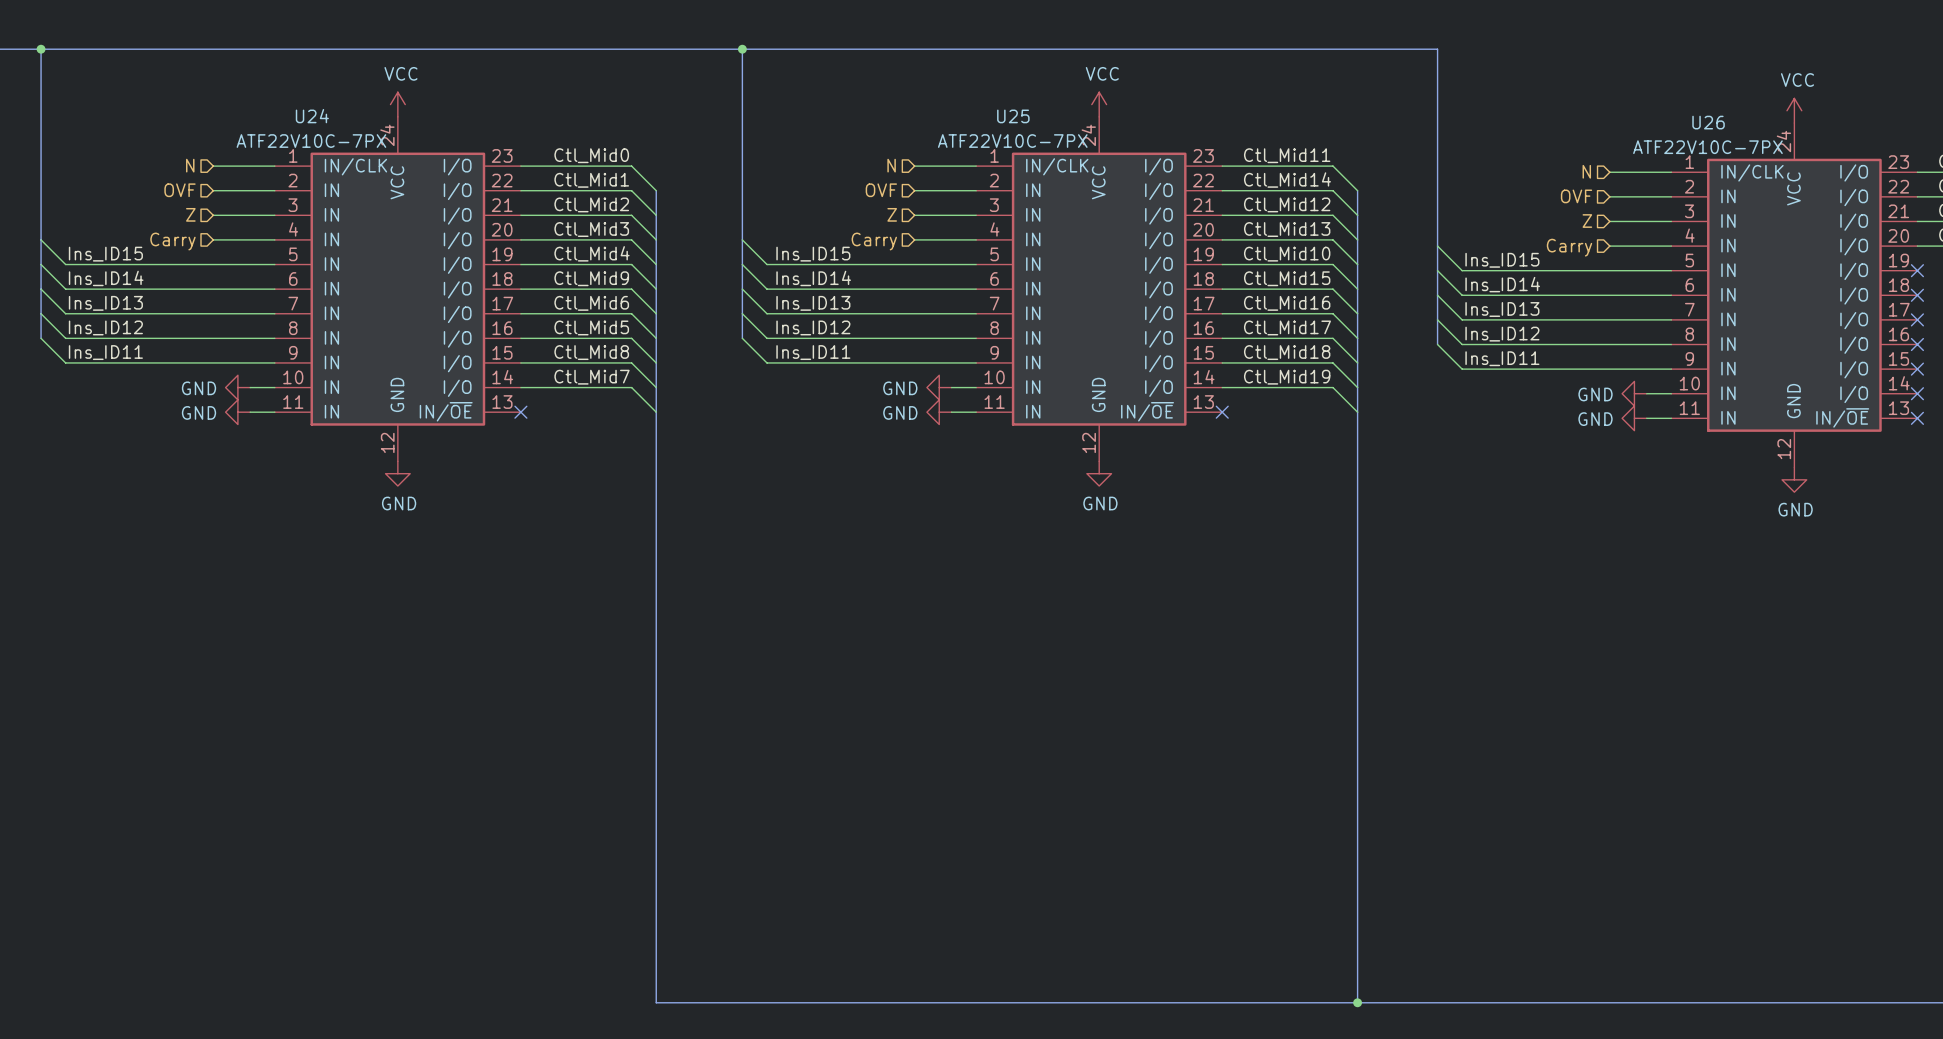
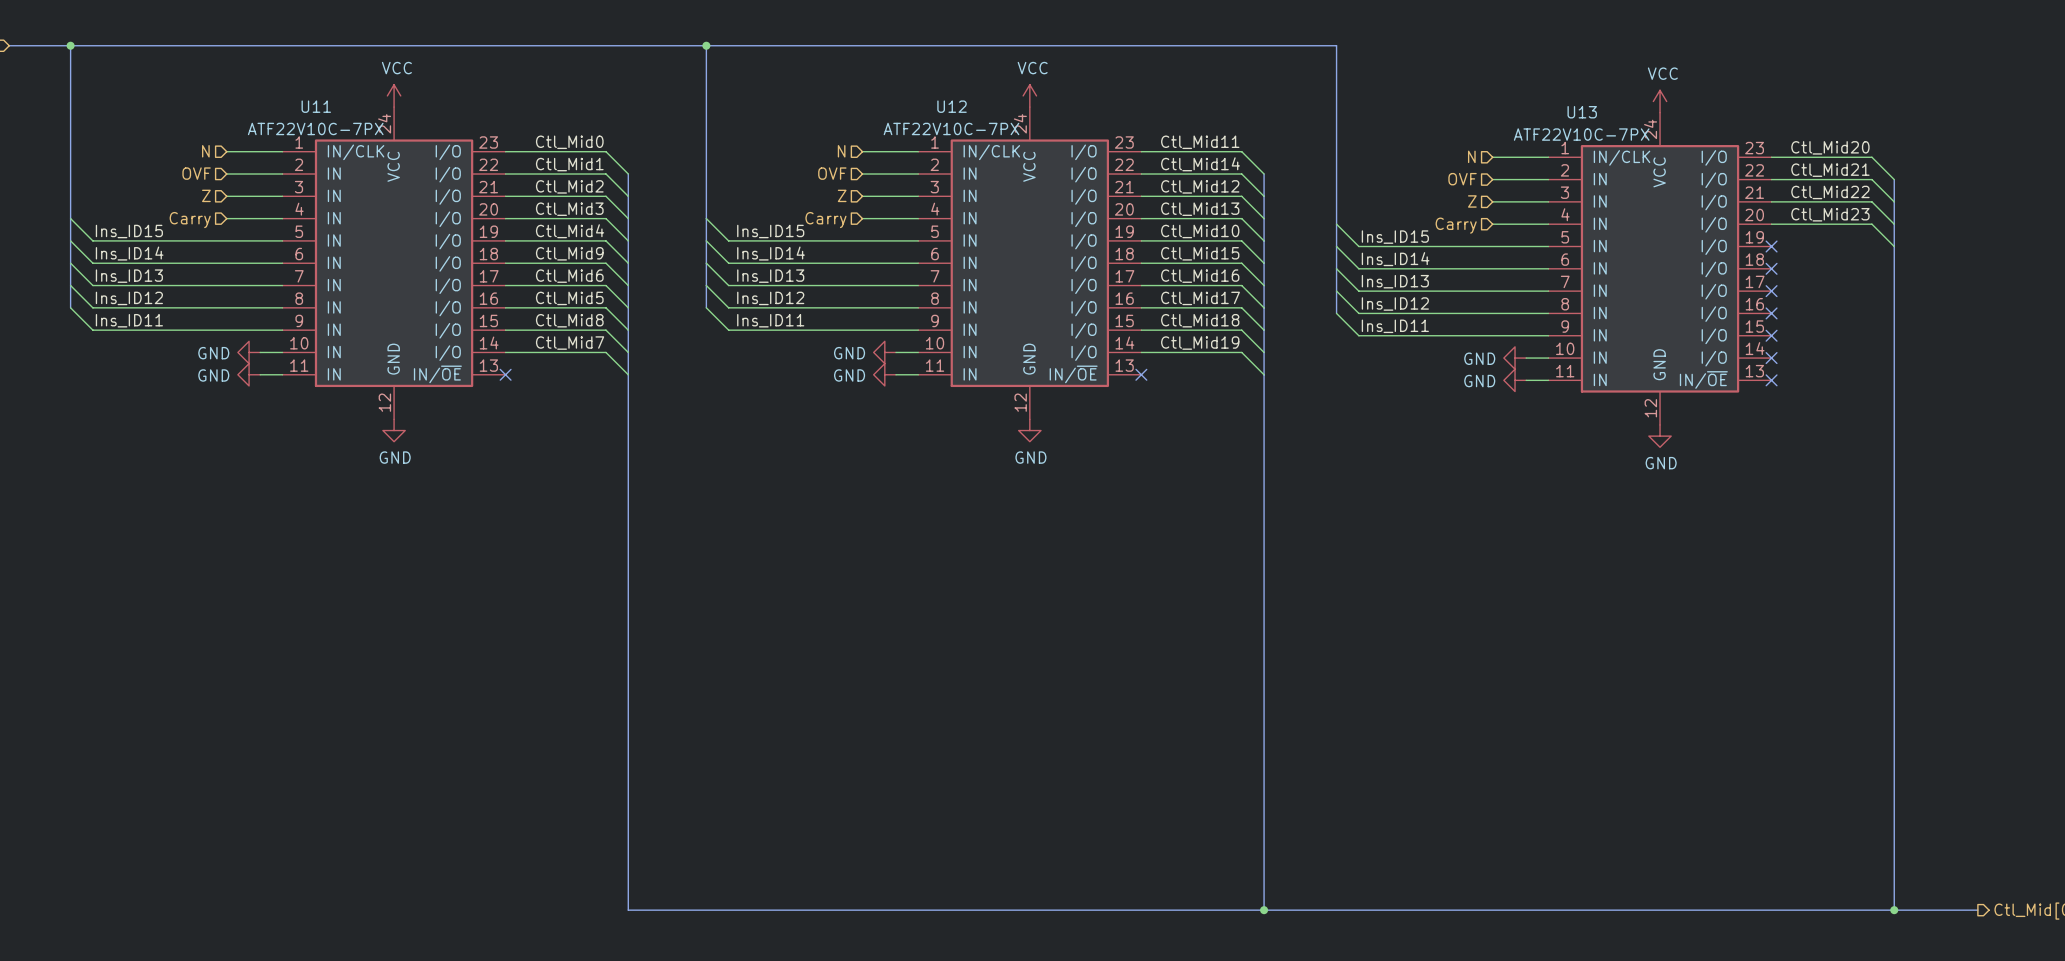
U24 name: U24 (312, 116) -> U11 (316, 106)
U25 name: U25 (1013, 116) -> U12 (952, 106)
U26 name: U26 (1708, 122) -> U13 (1582, 112)

